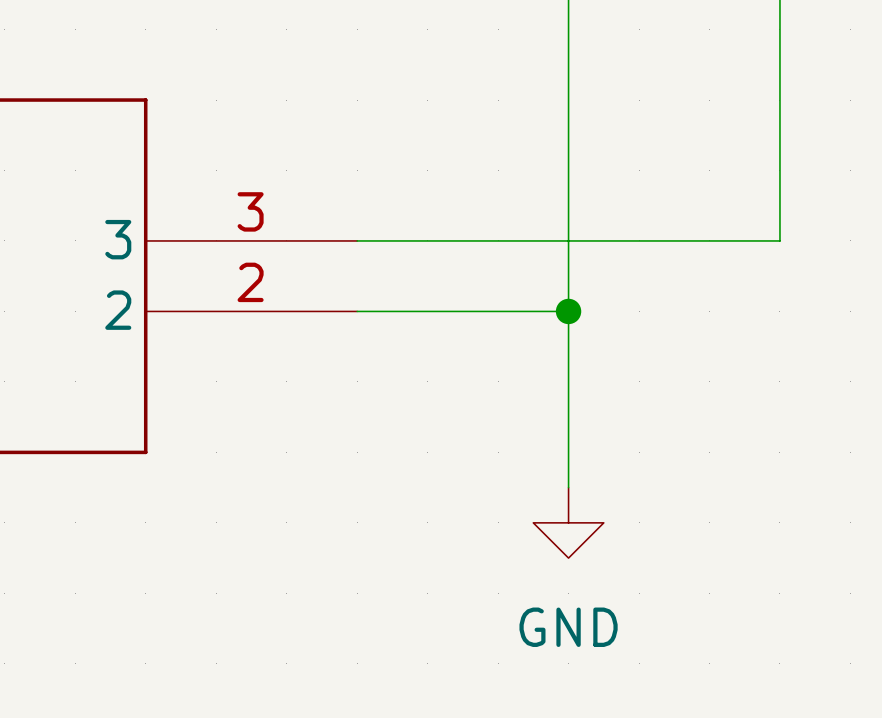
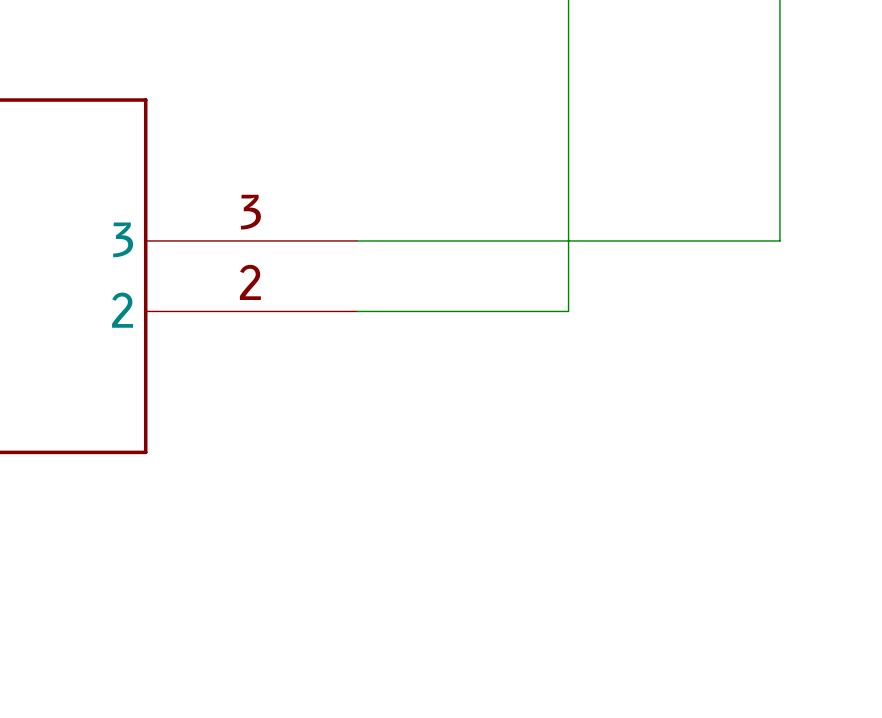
wire: (568, 311) (568, 487) -> none
junction: (568, 311) -> none
power symbol: GND (568, 522) -> none

